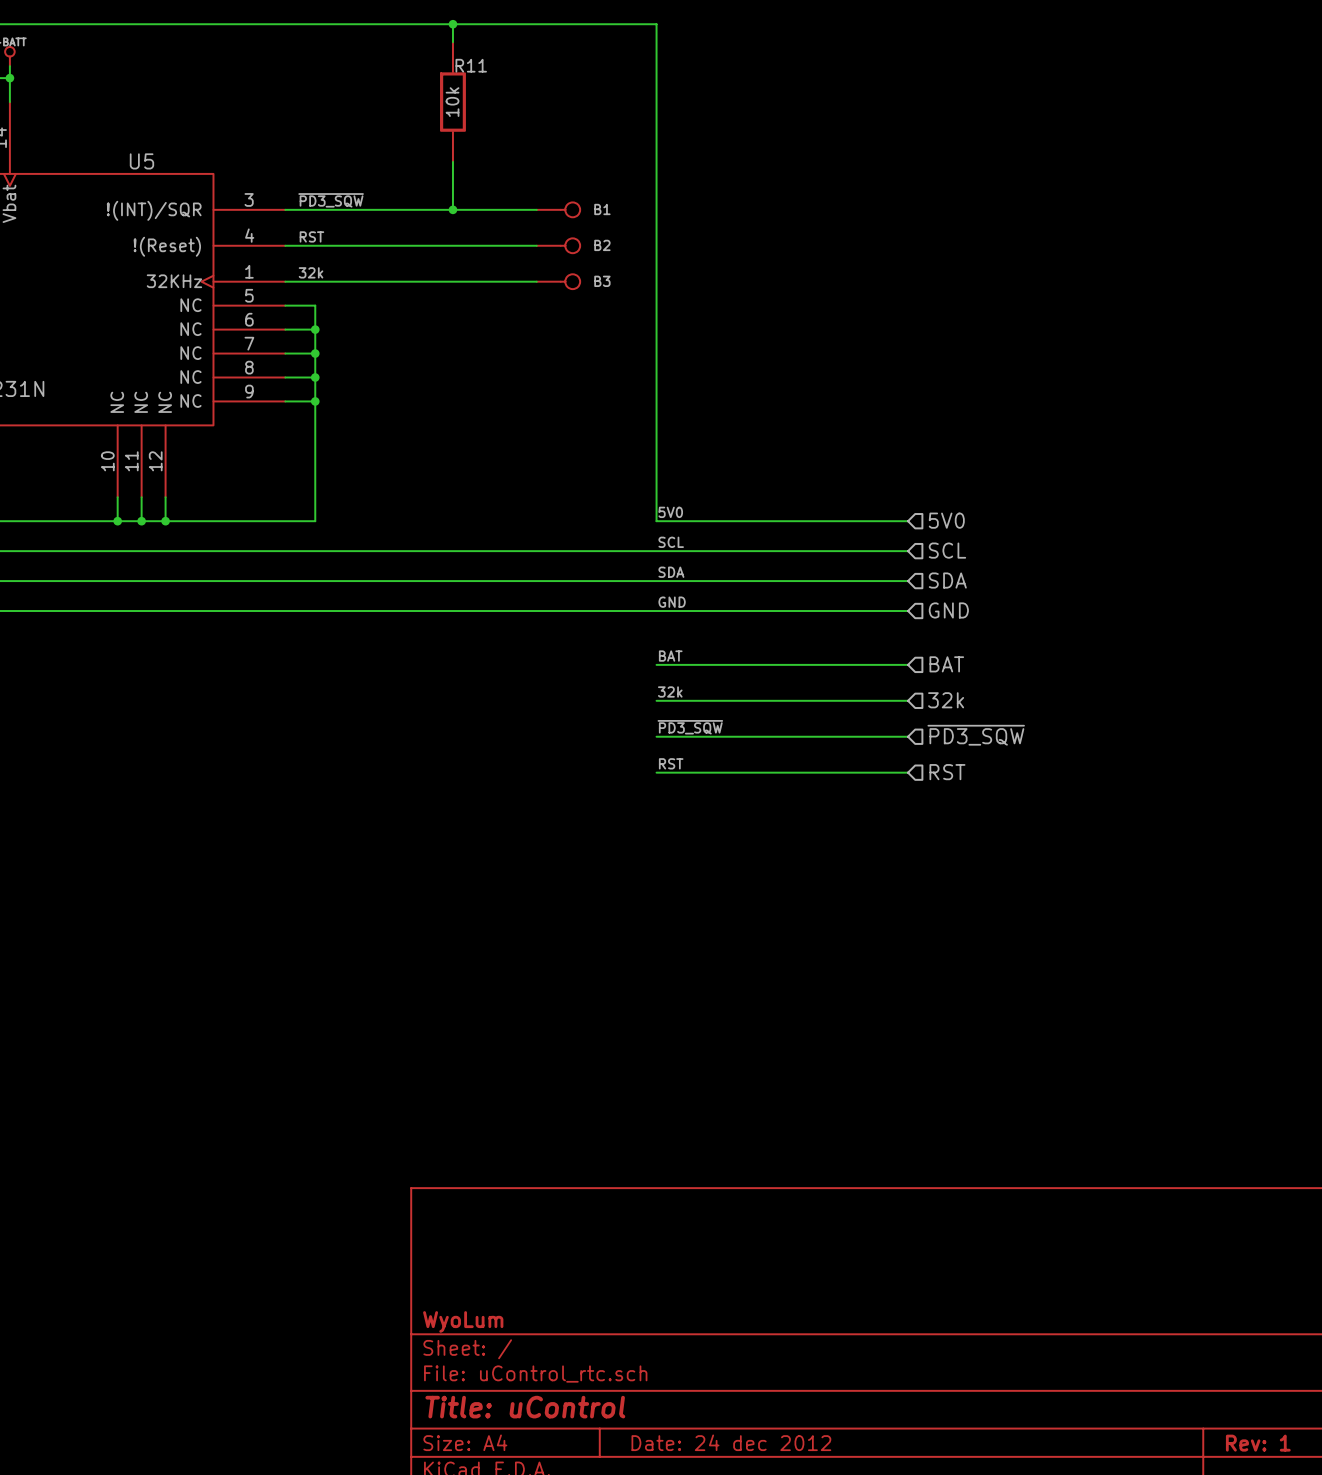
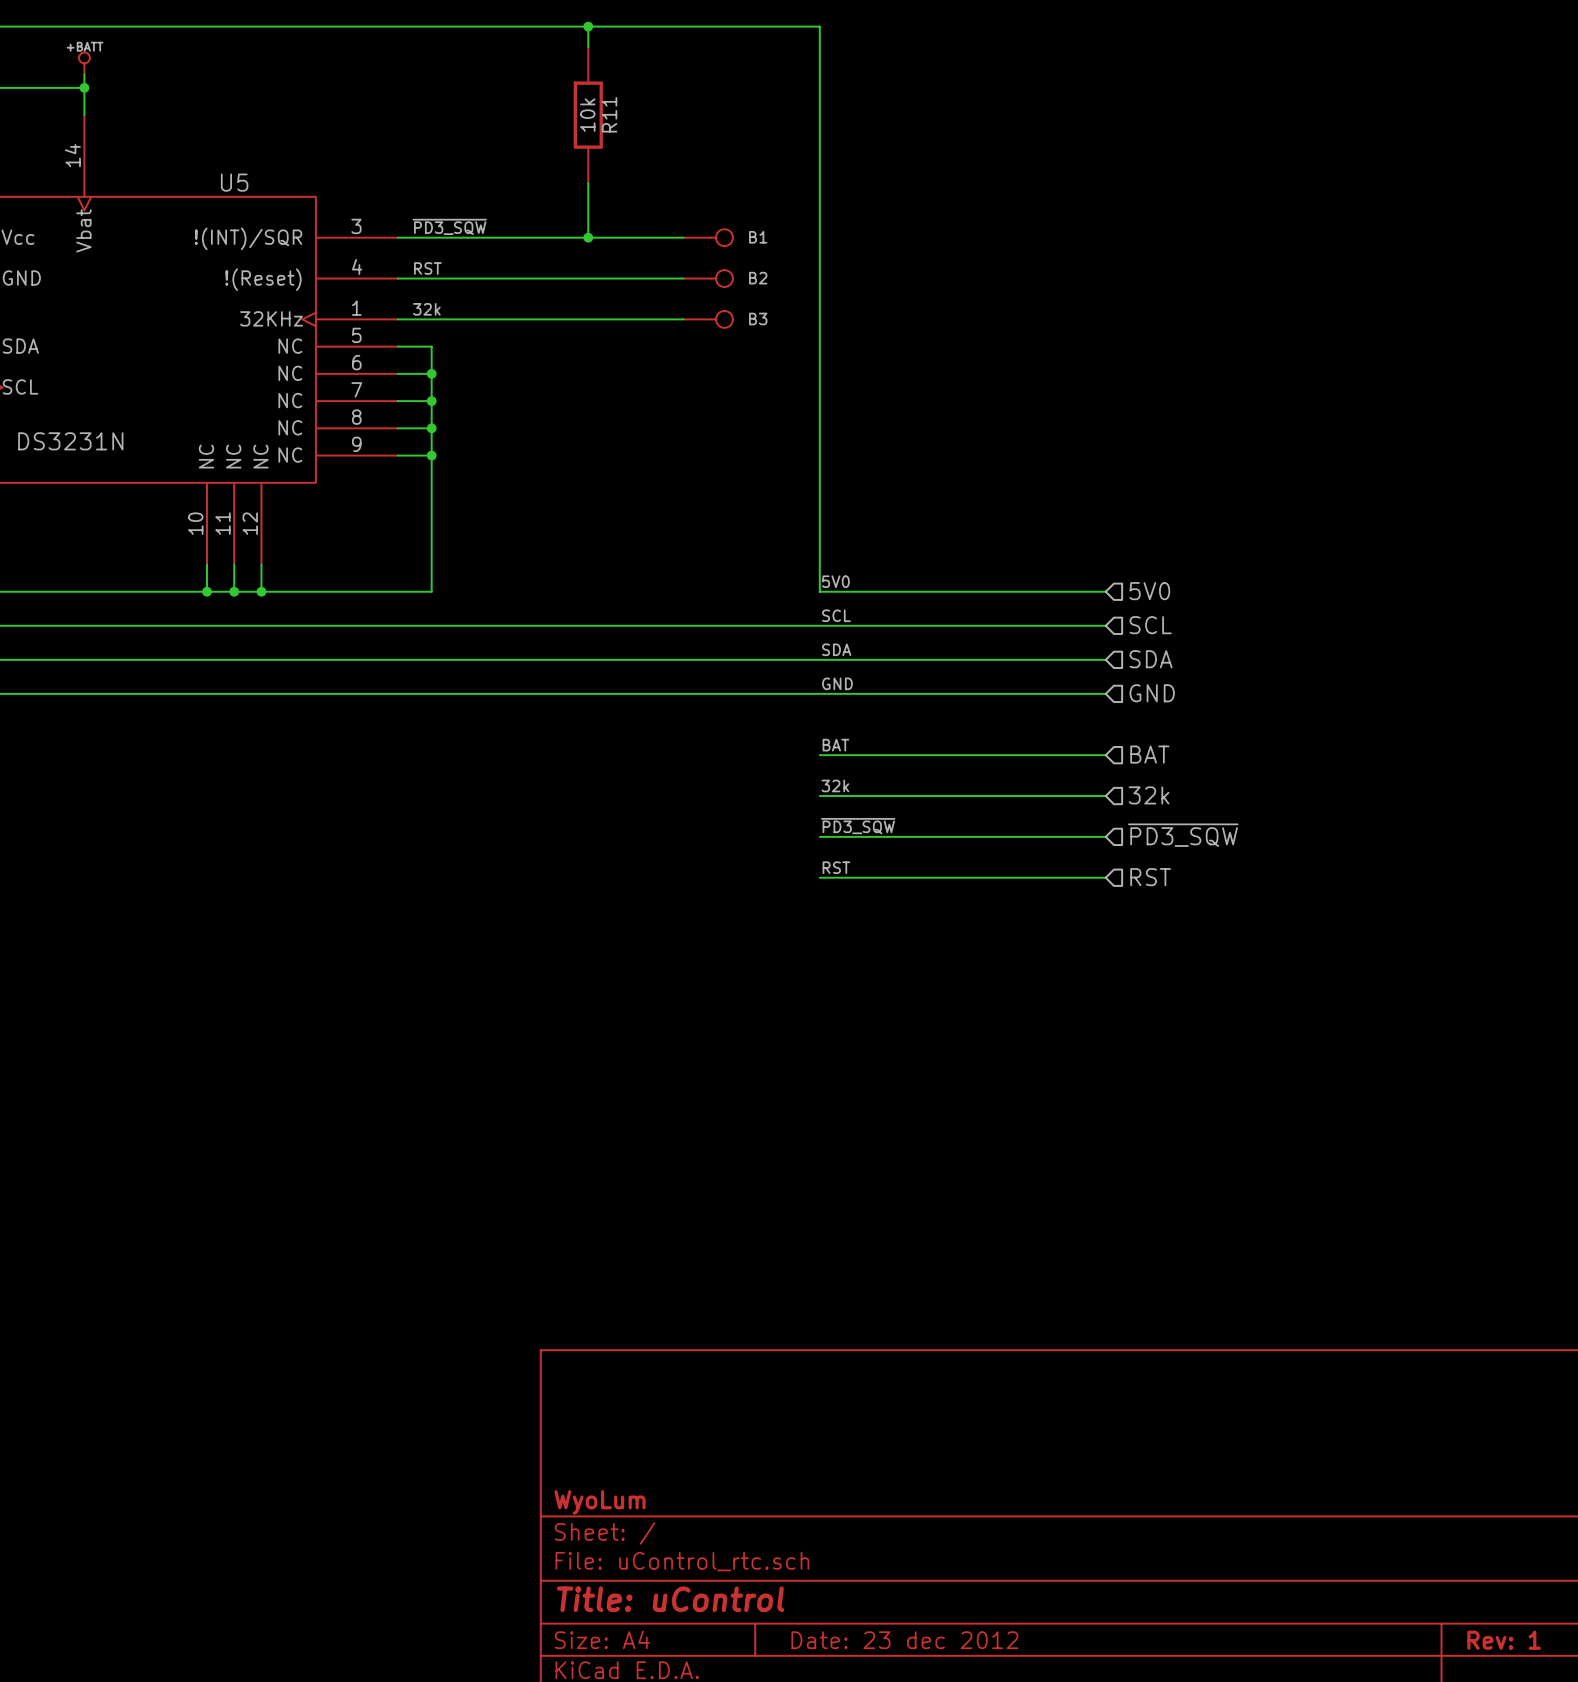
R11 name rotation: 0° (471, 65) -> 90° counterclockwise (609, 114)
title block: Date: 24 dec 2012 (731, 1442) -> Date: 23 dec 2012 (904, 1640)

